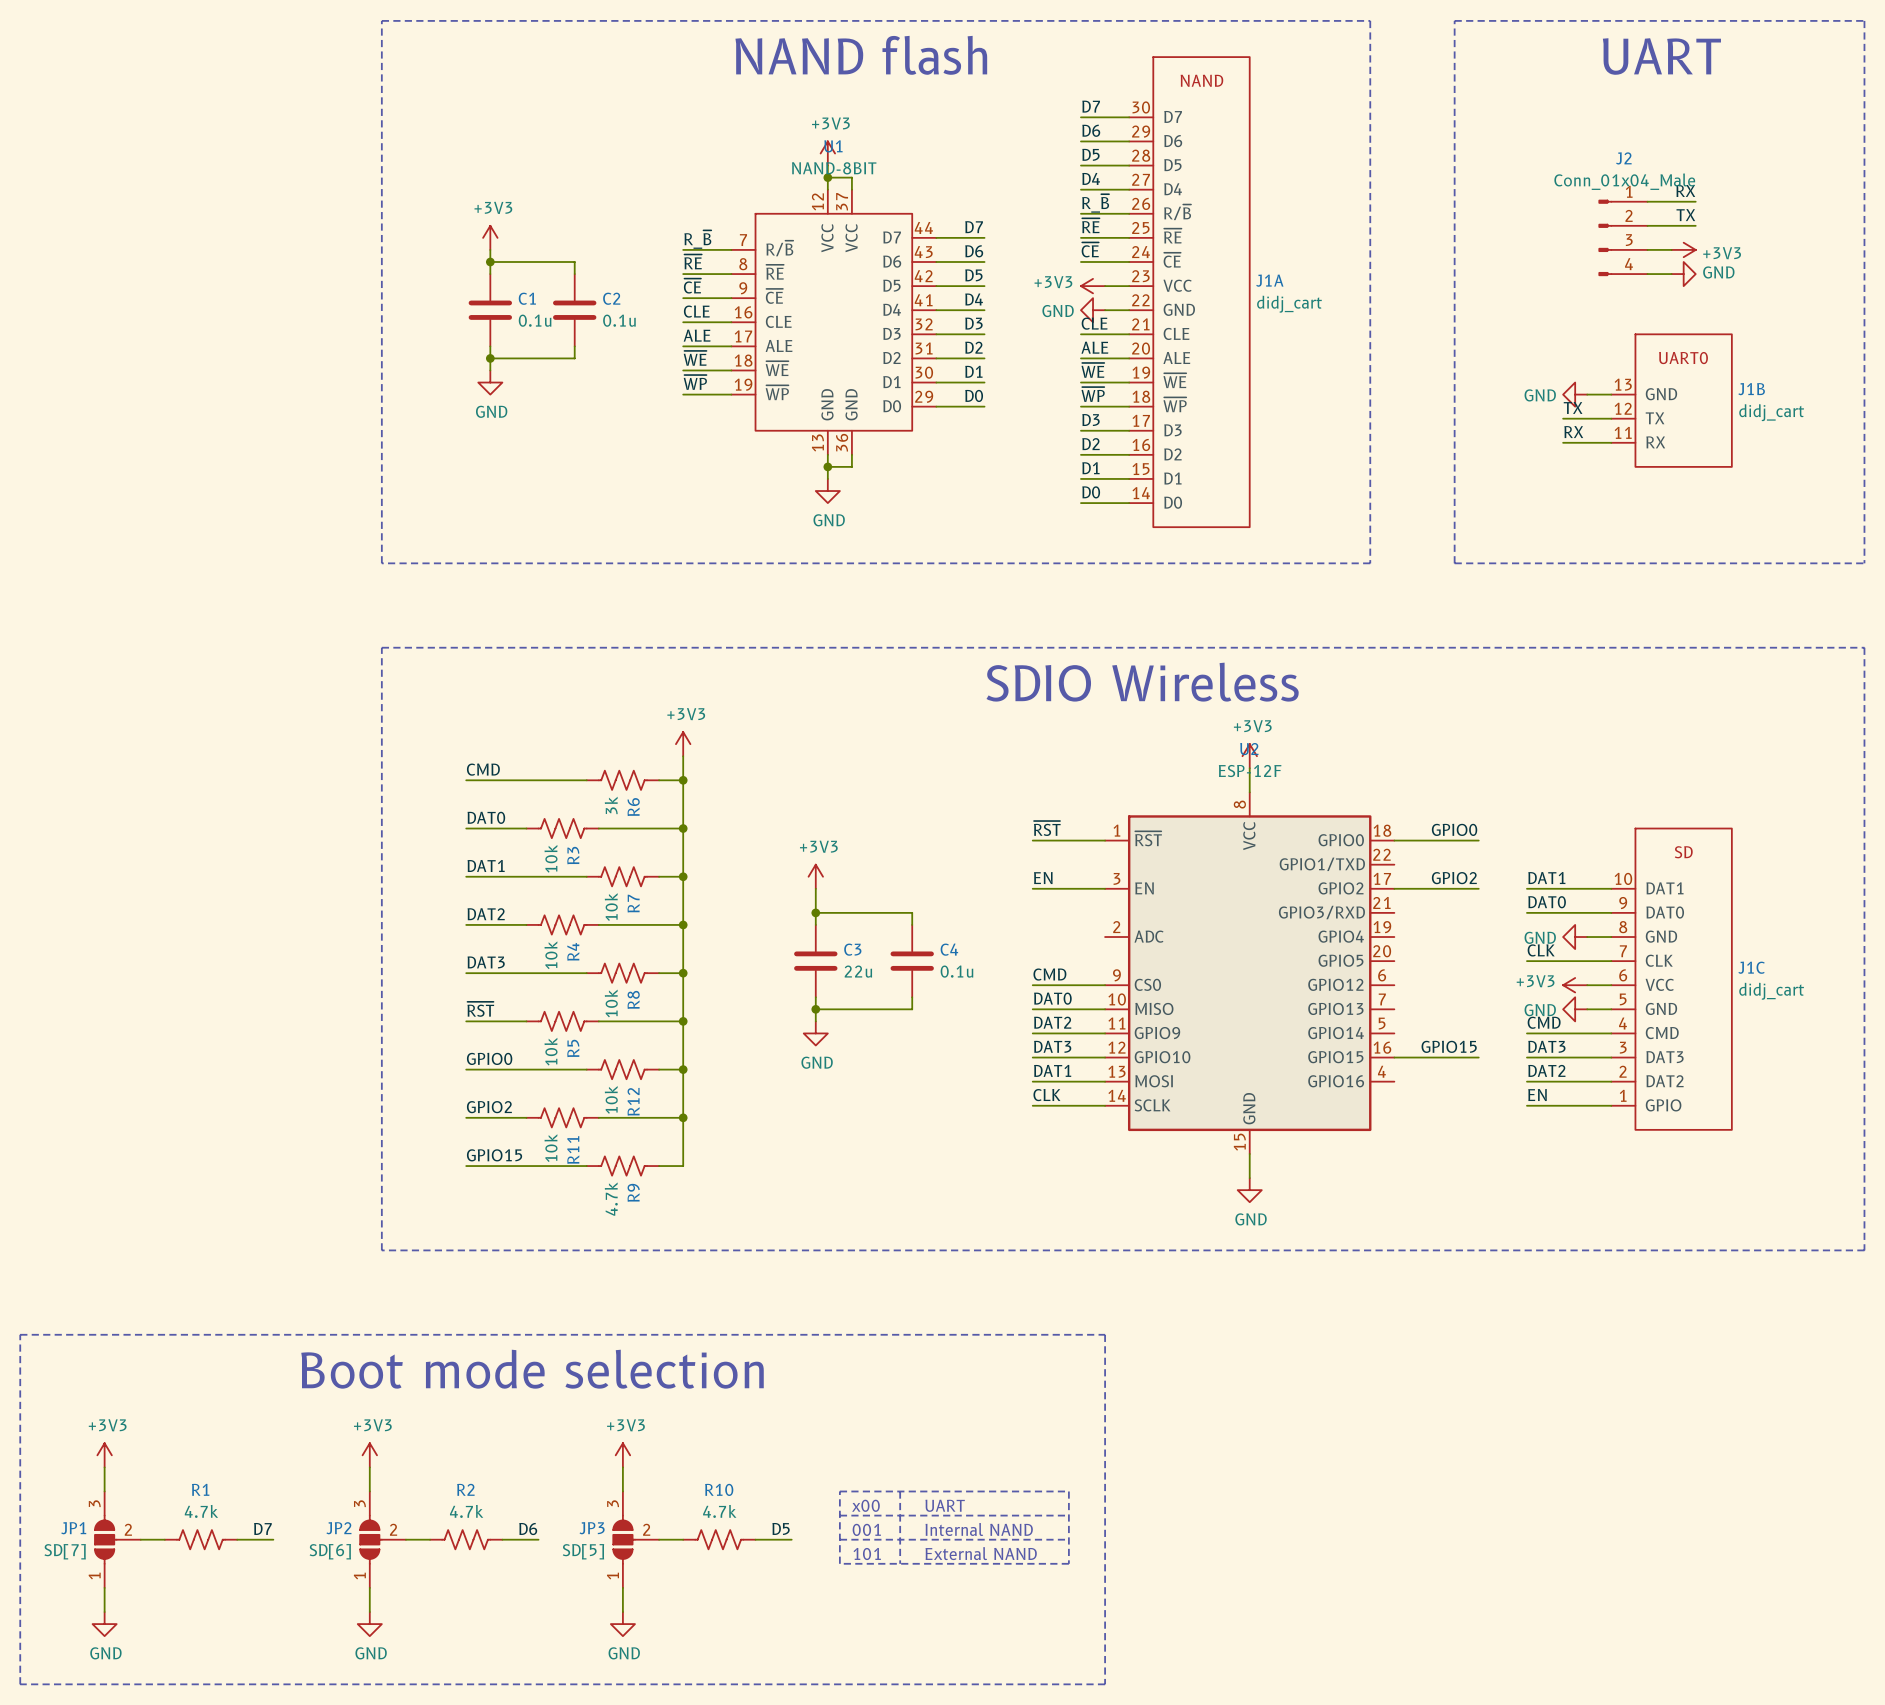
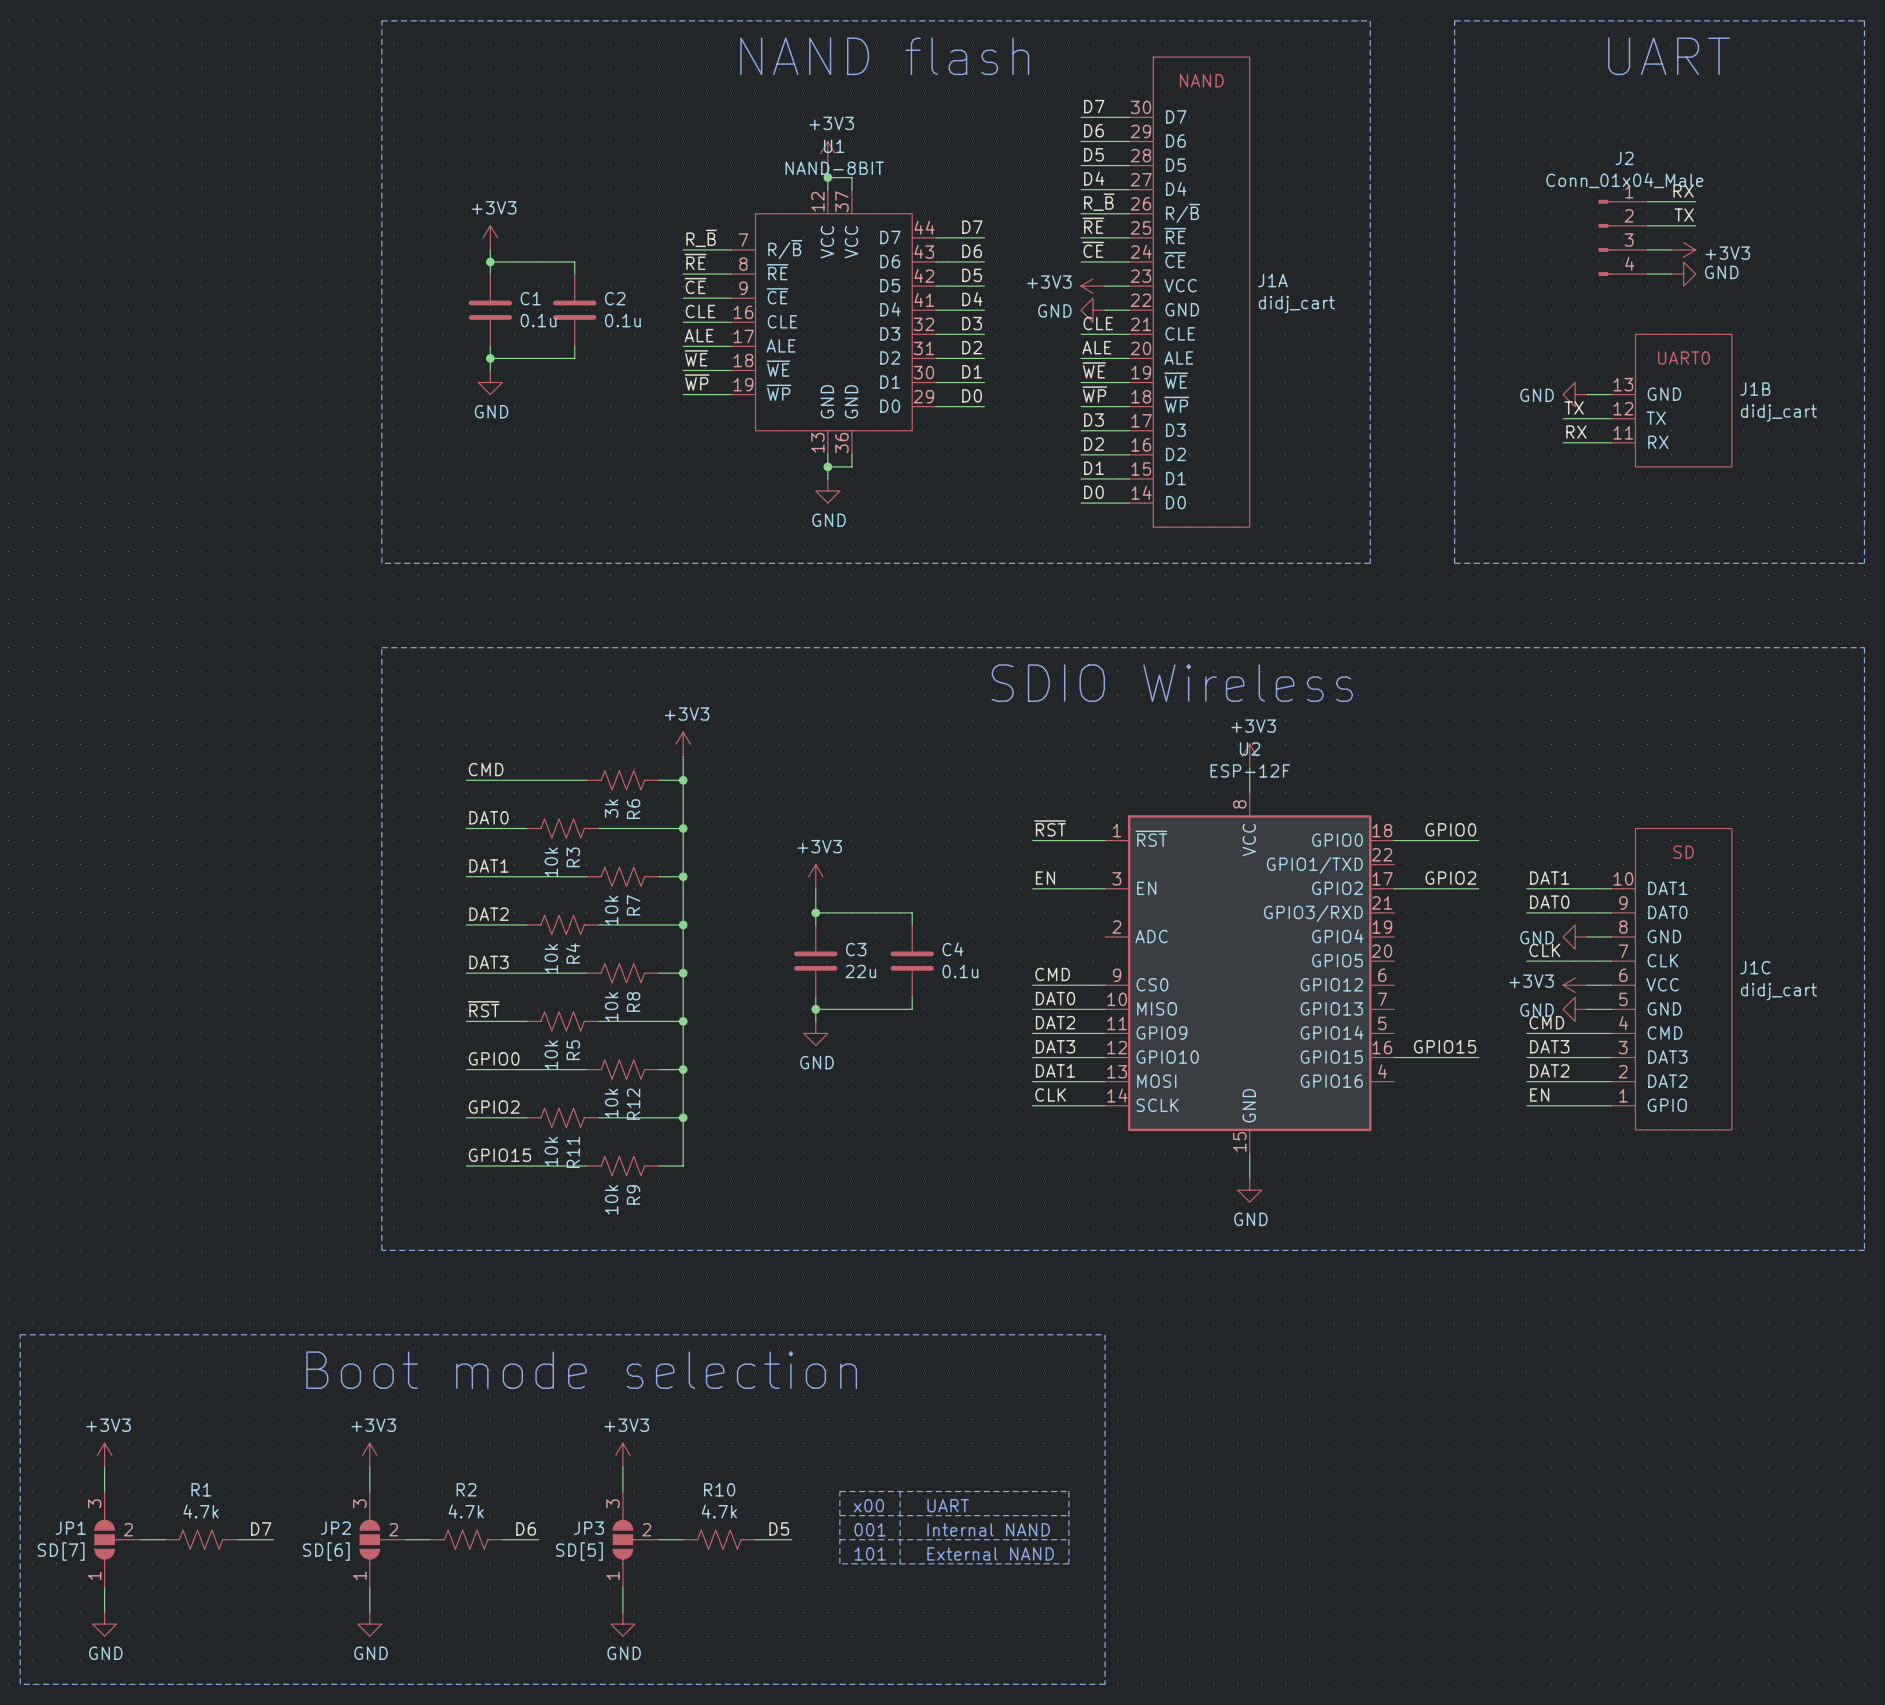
R9 value: 4.7k (611, 1199) -> 10k (611, 1199)

